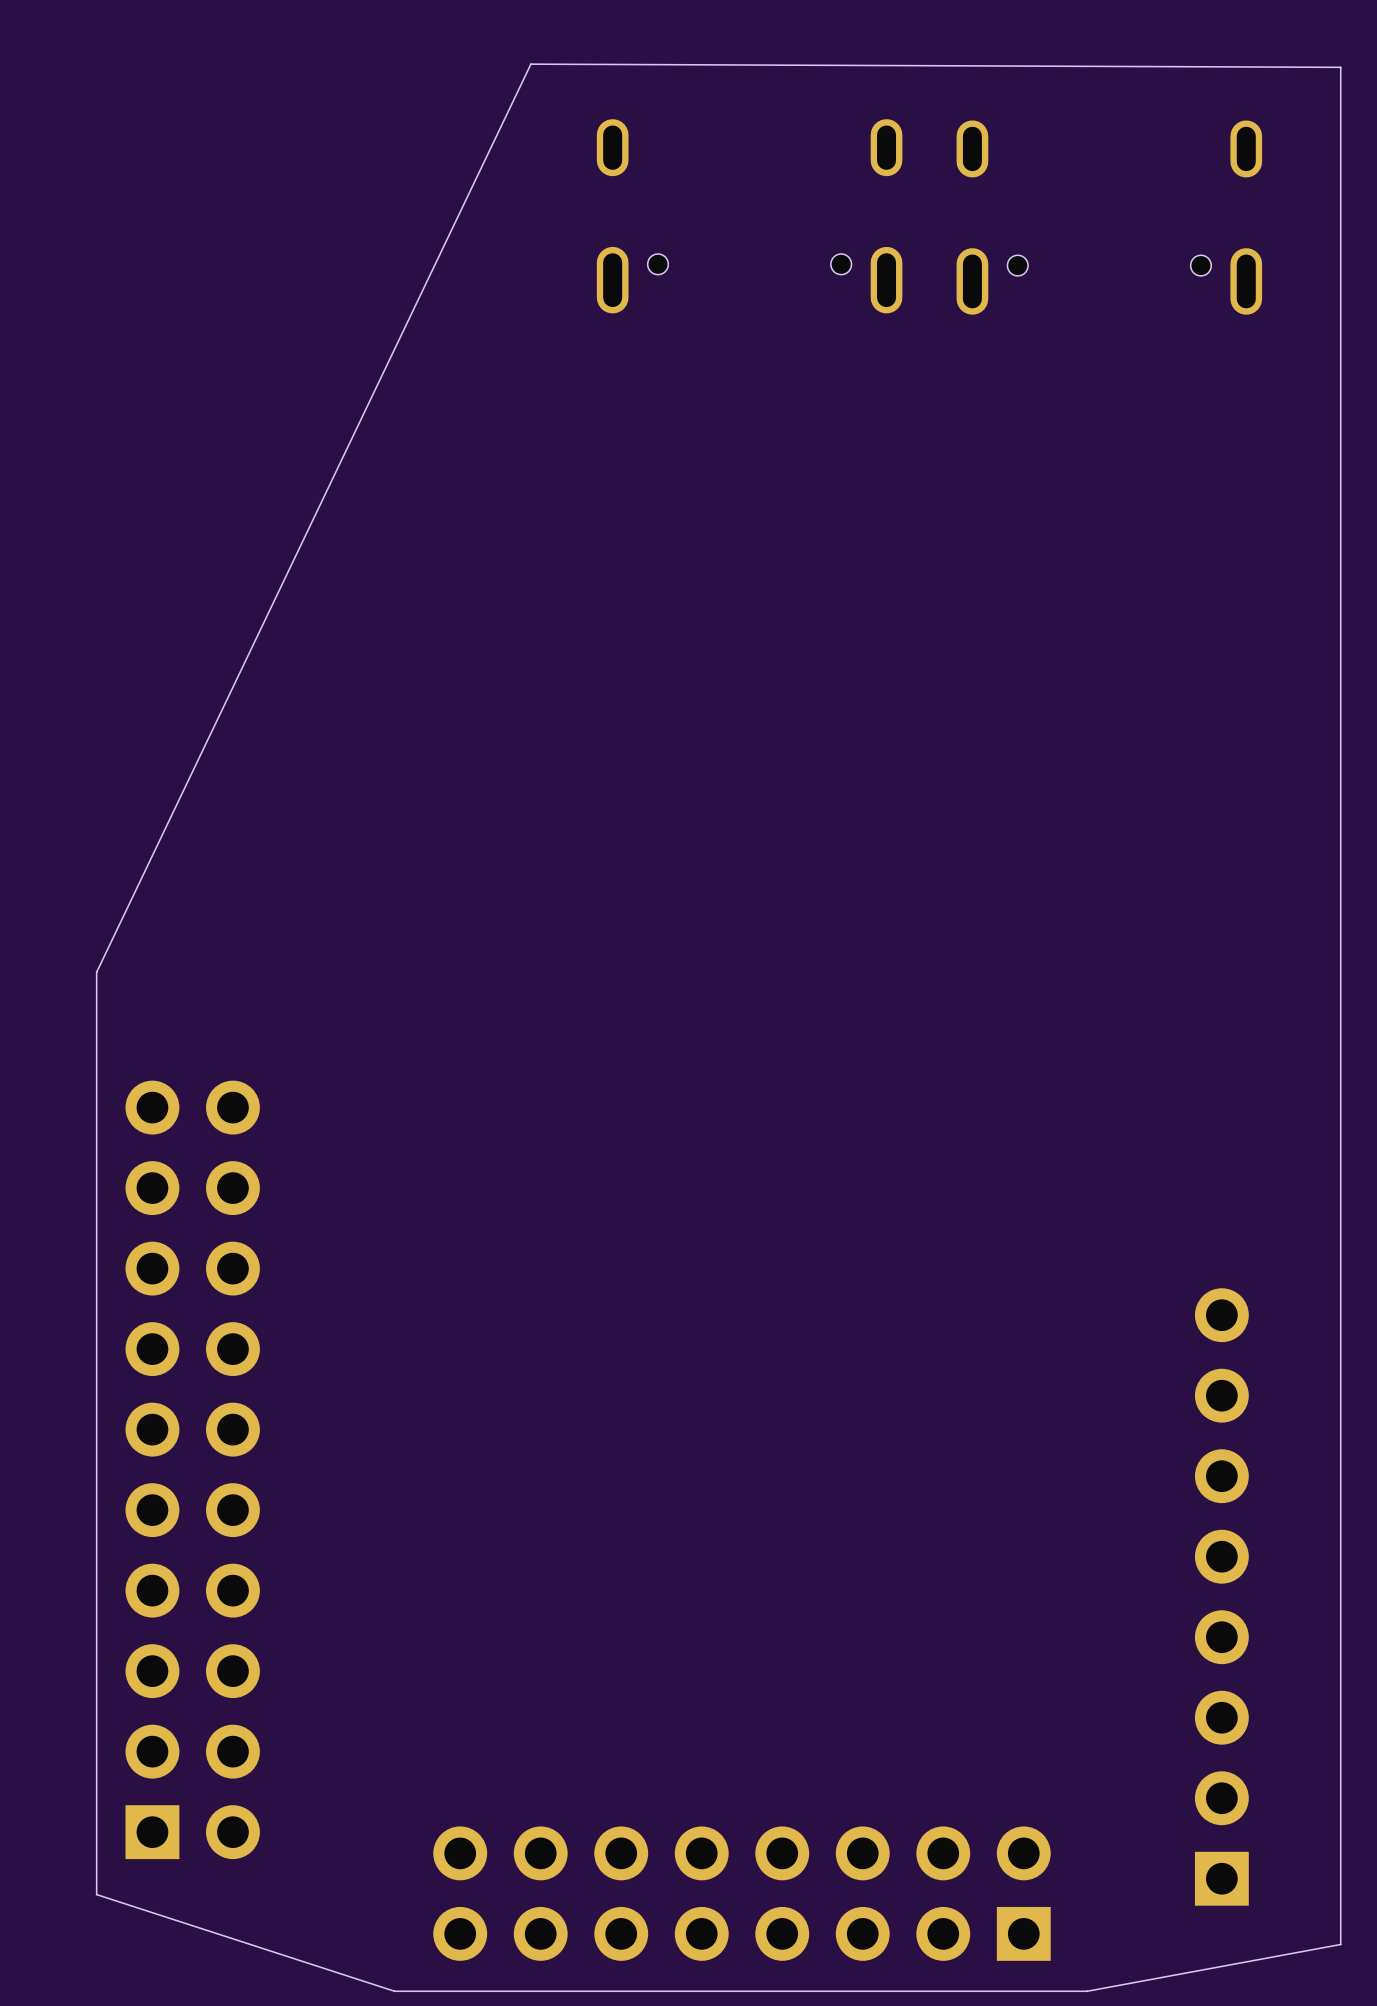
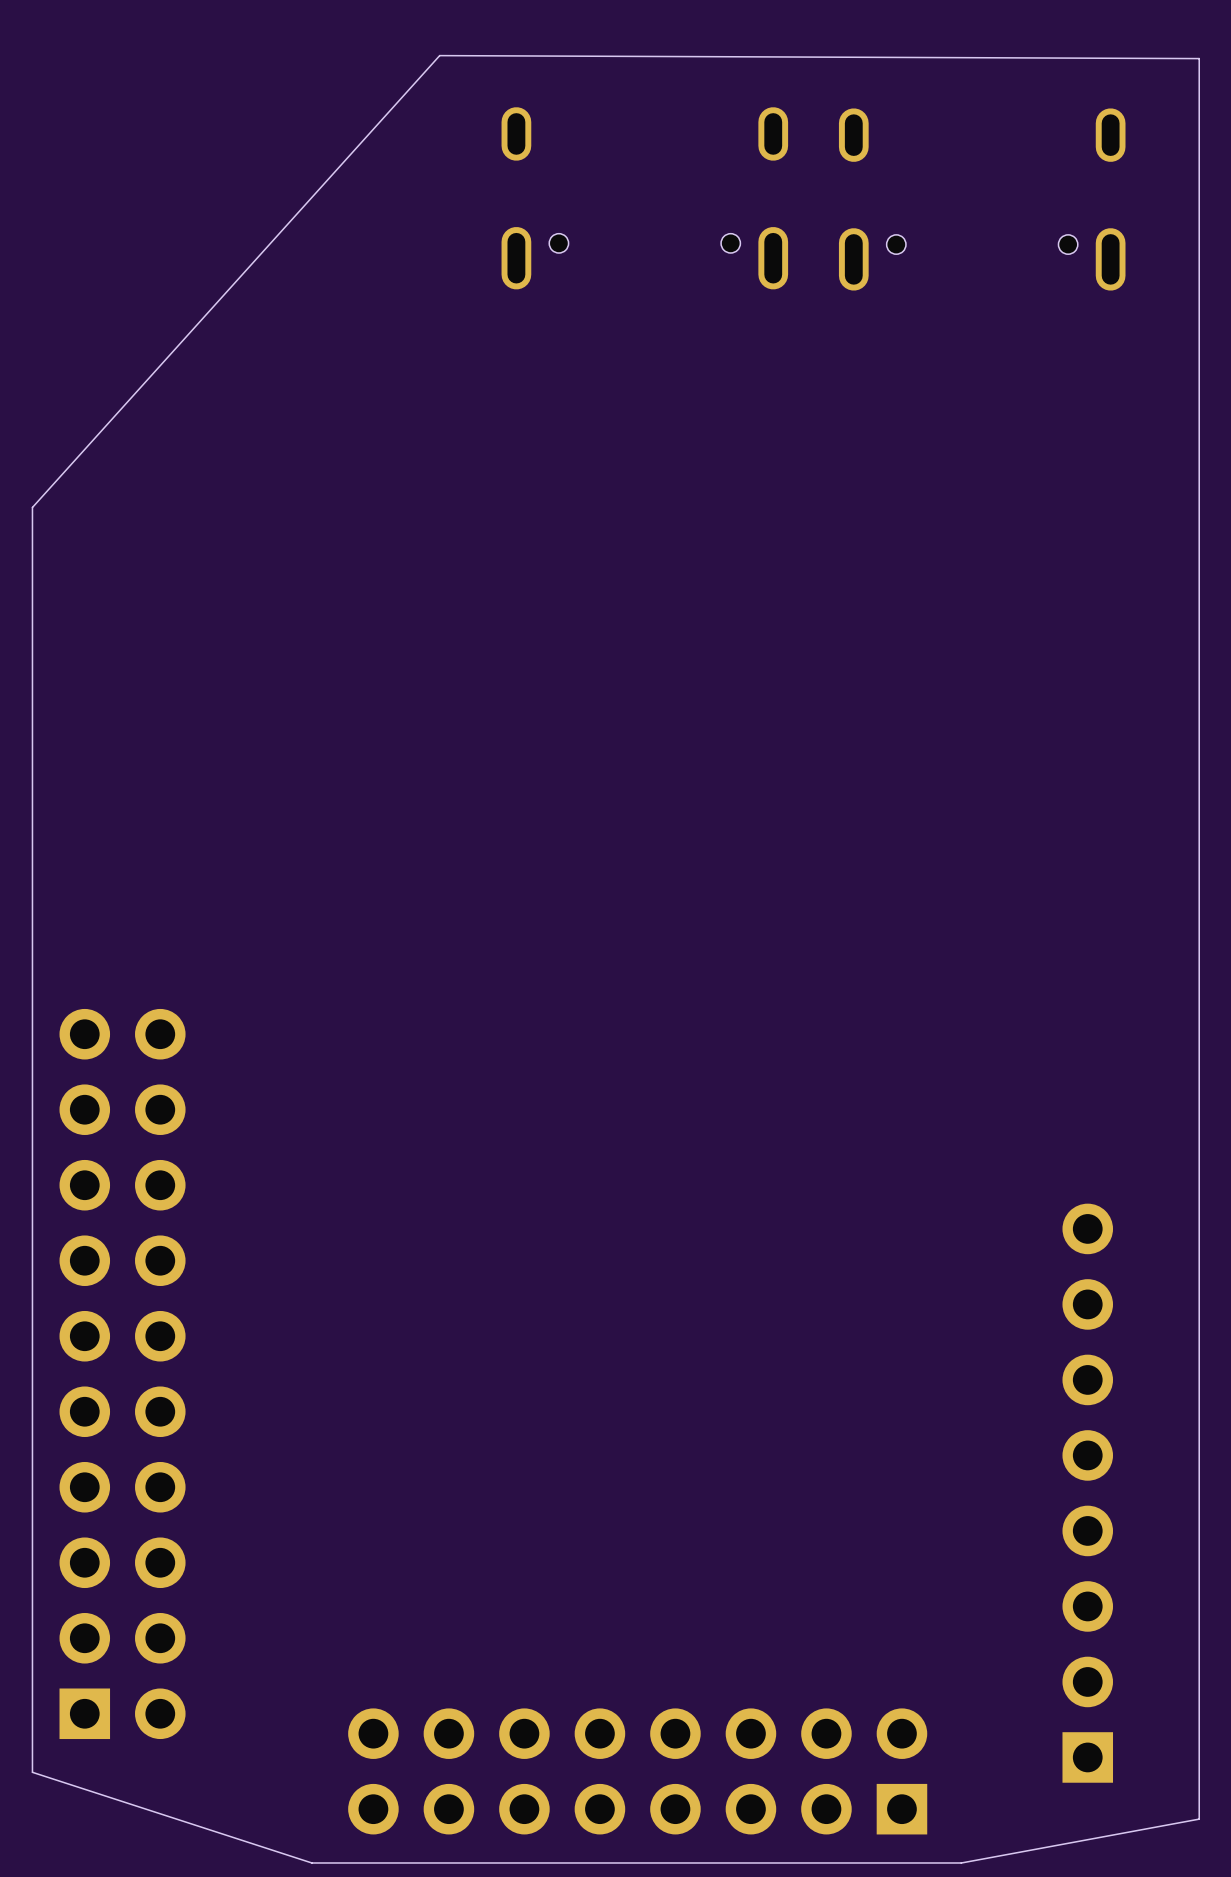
board edge: (530, 64) (96, 972) -> (439, 55) (32, 507) (32, 907)

